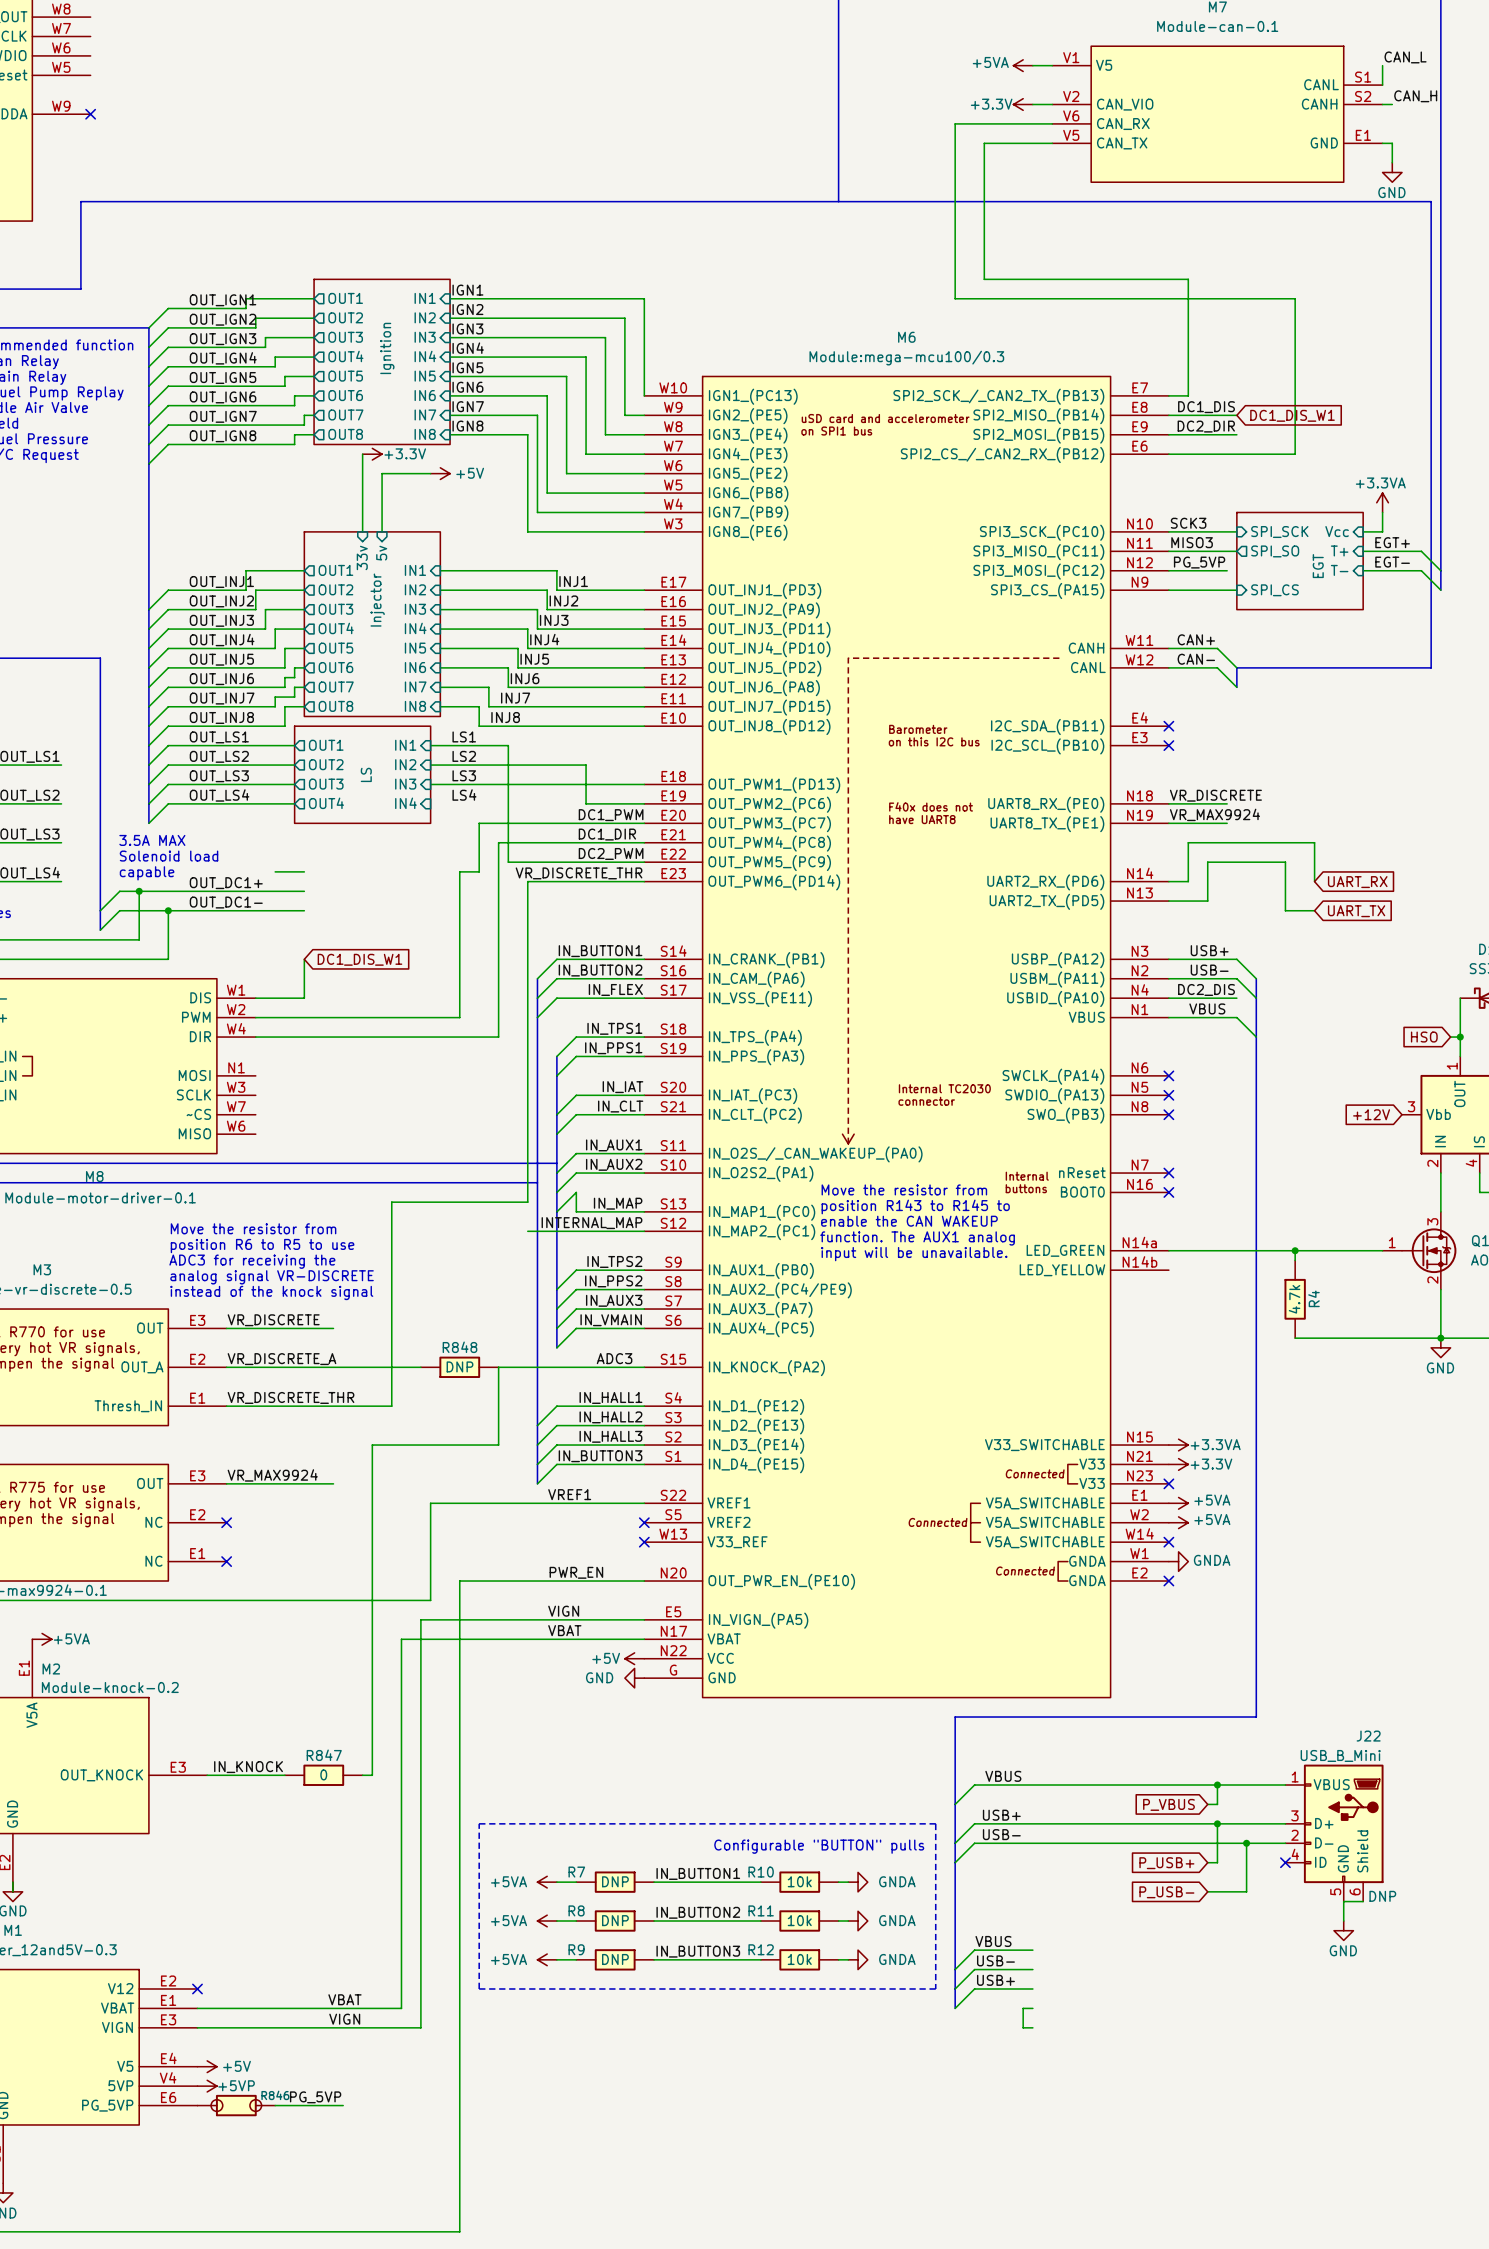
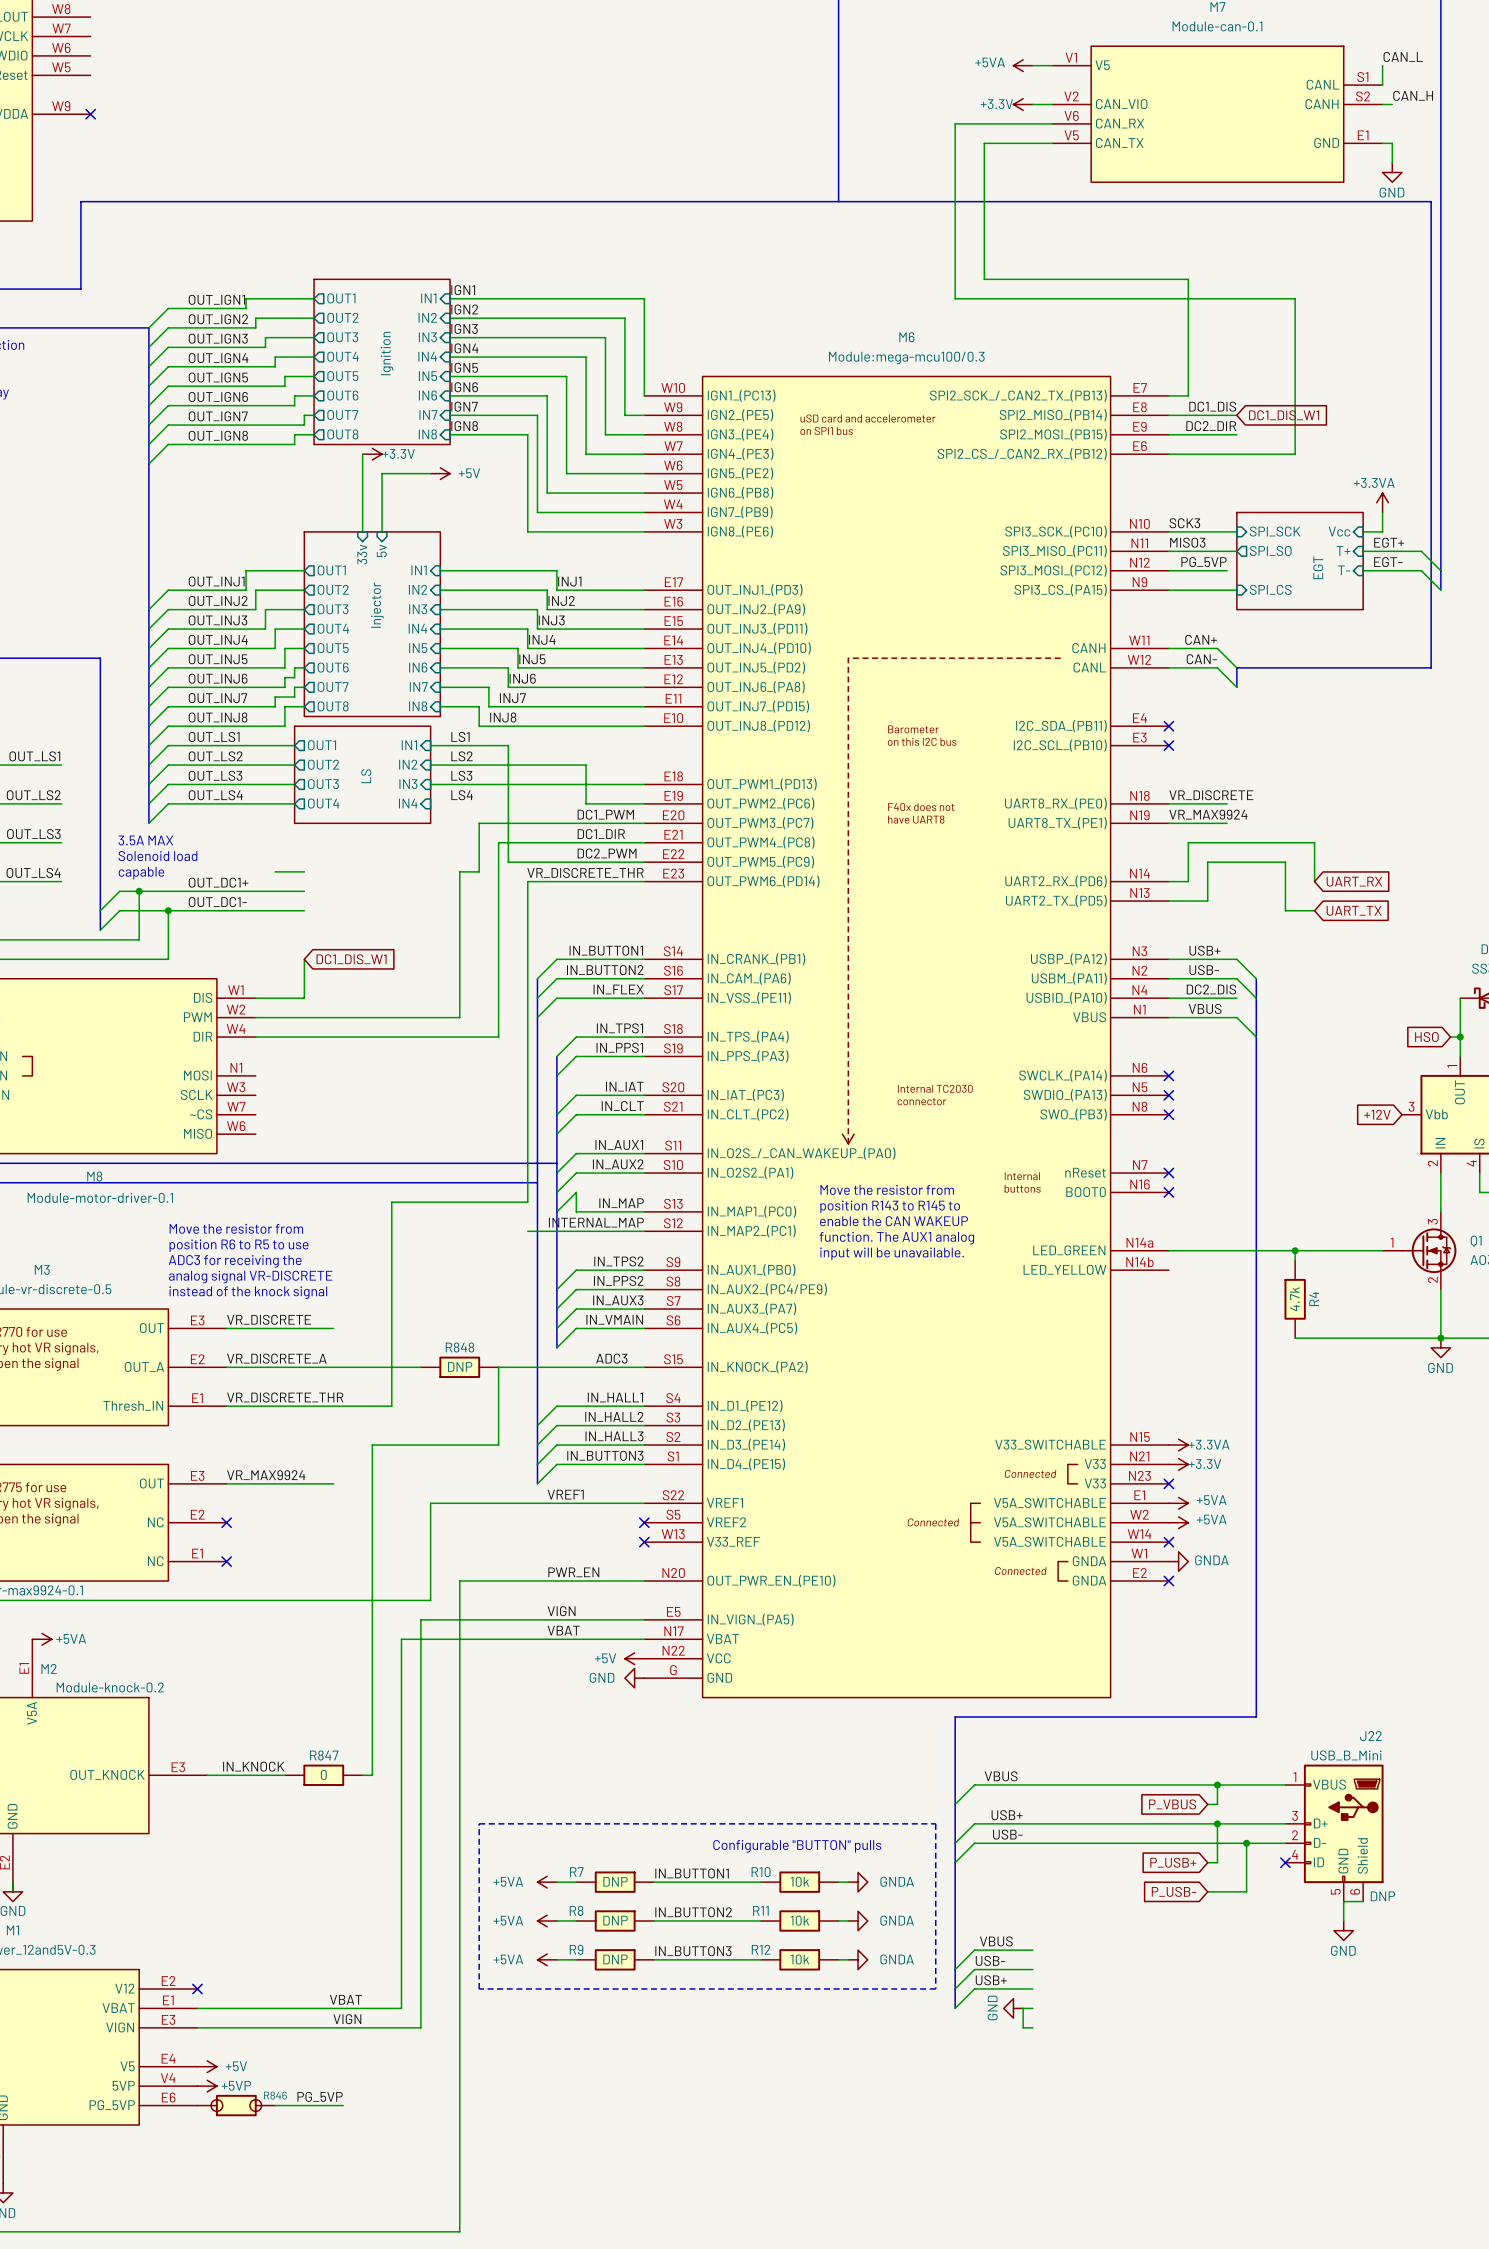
power symbol: none -> GND (1013, 2008)

